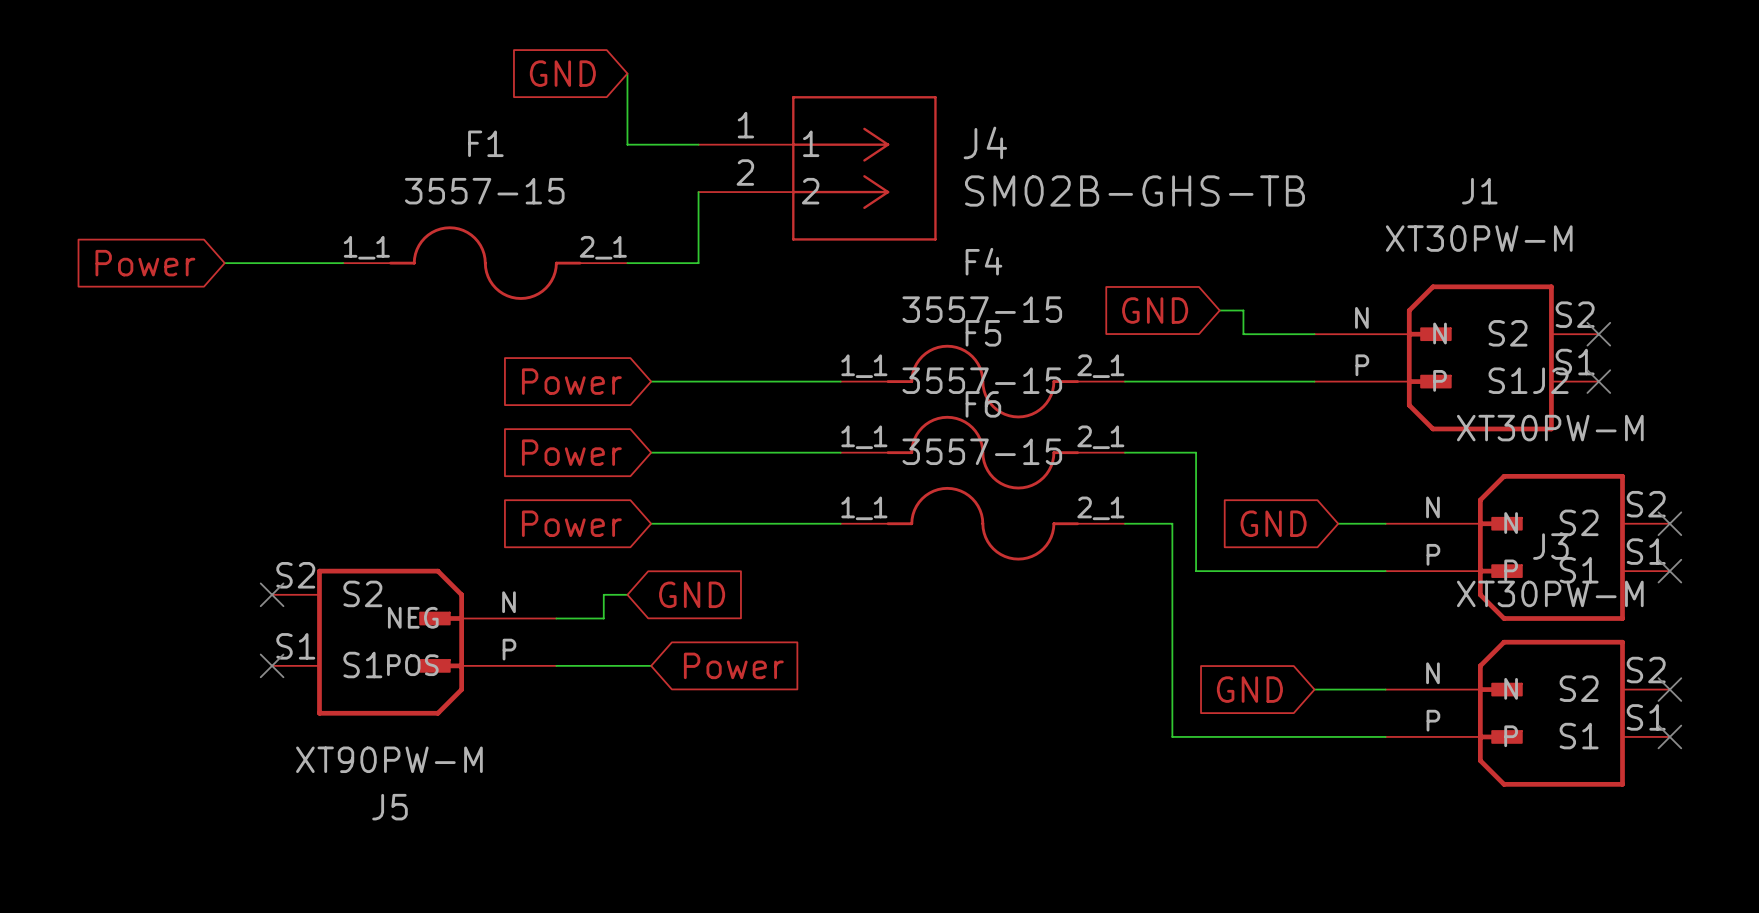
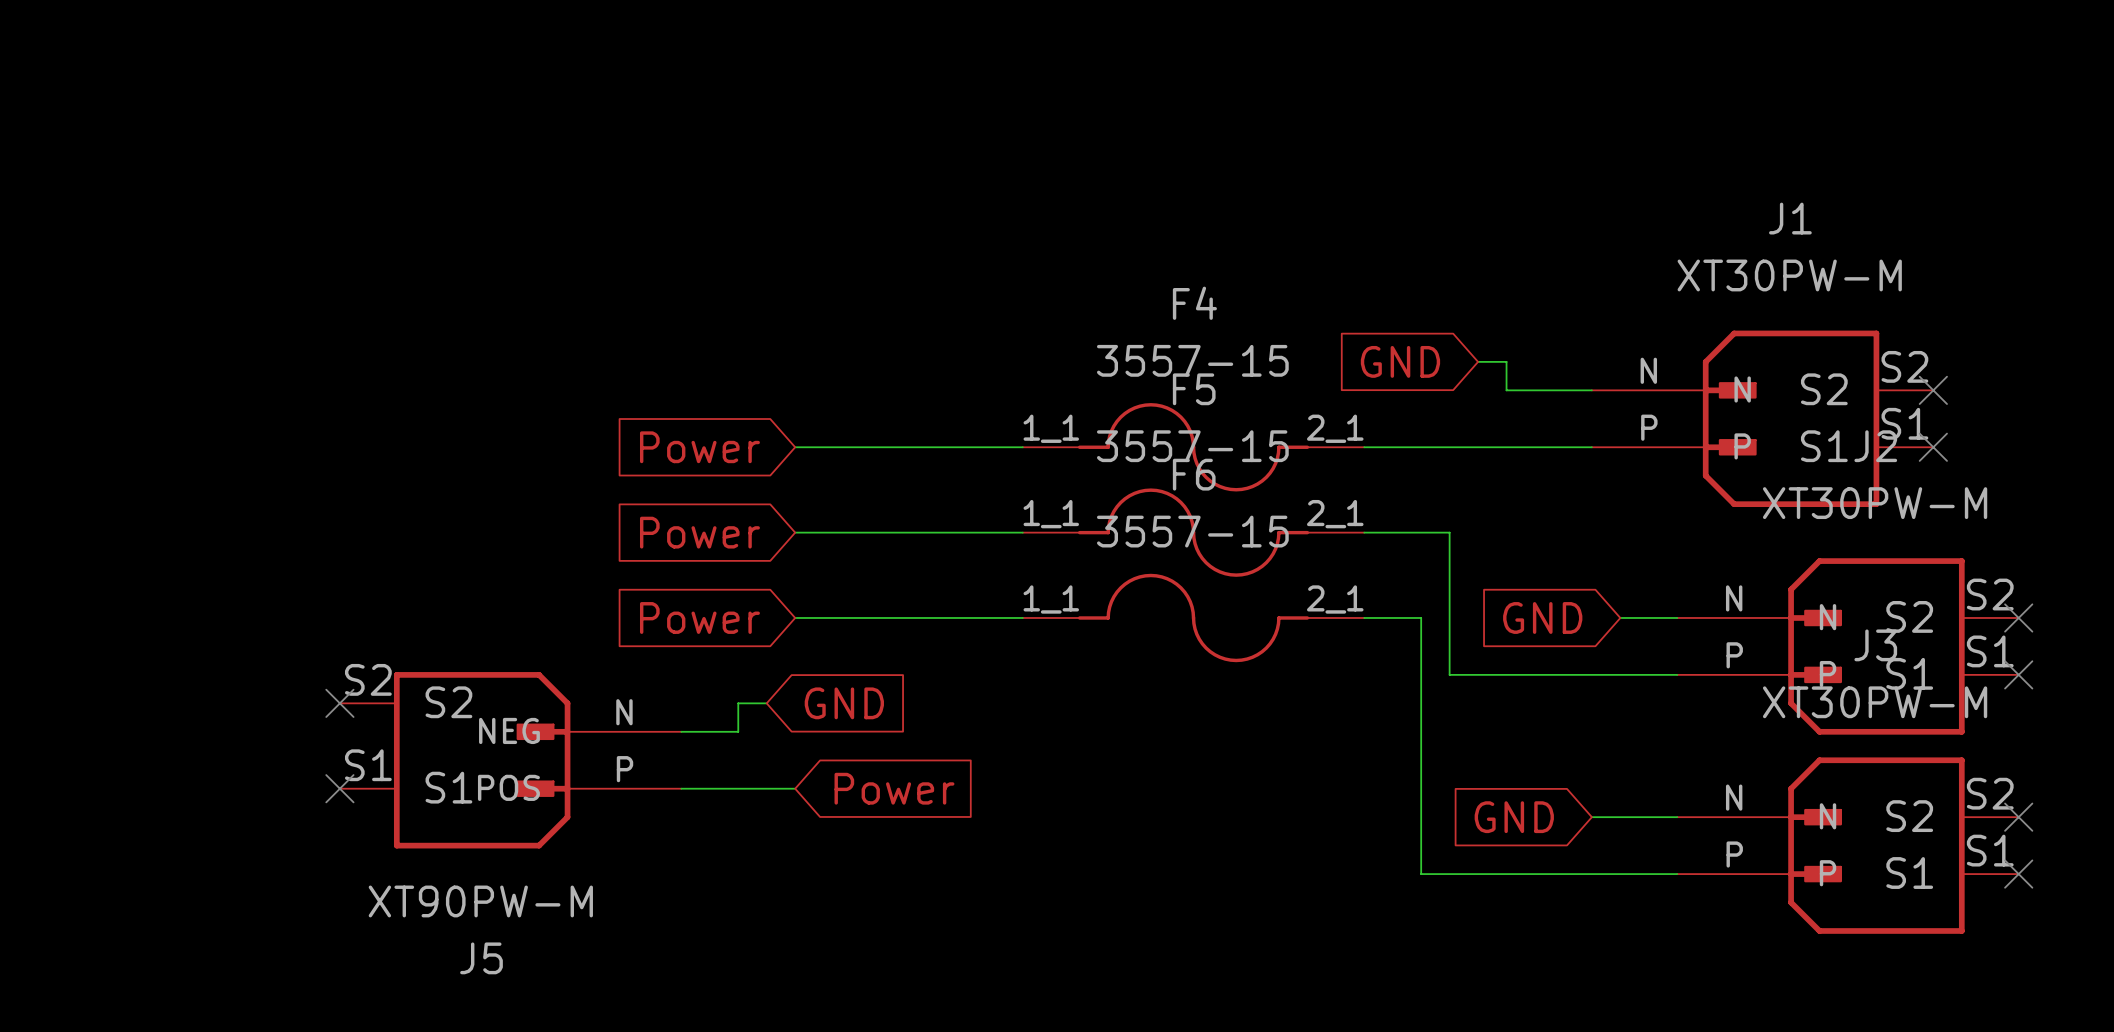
global label: GND (562, 73) -> none
wire: (627, 73) (627, 144) (698, 144) -> none
J4: SM02B-GHS-TB (817, 168) -> none
wire: (698, 192) (698, 263) (627, 263) -> none
global label: Power (145, 263) -> none
wire: (224, 263) (343, 263) -> none
F1: 3557-15 (485, 263) -> none

